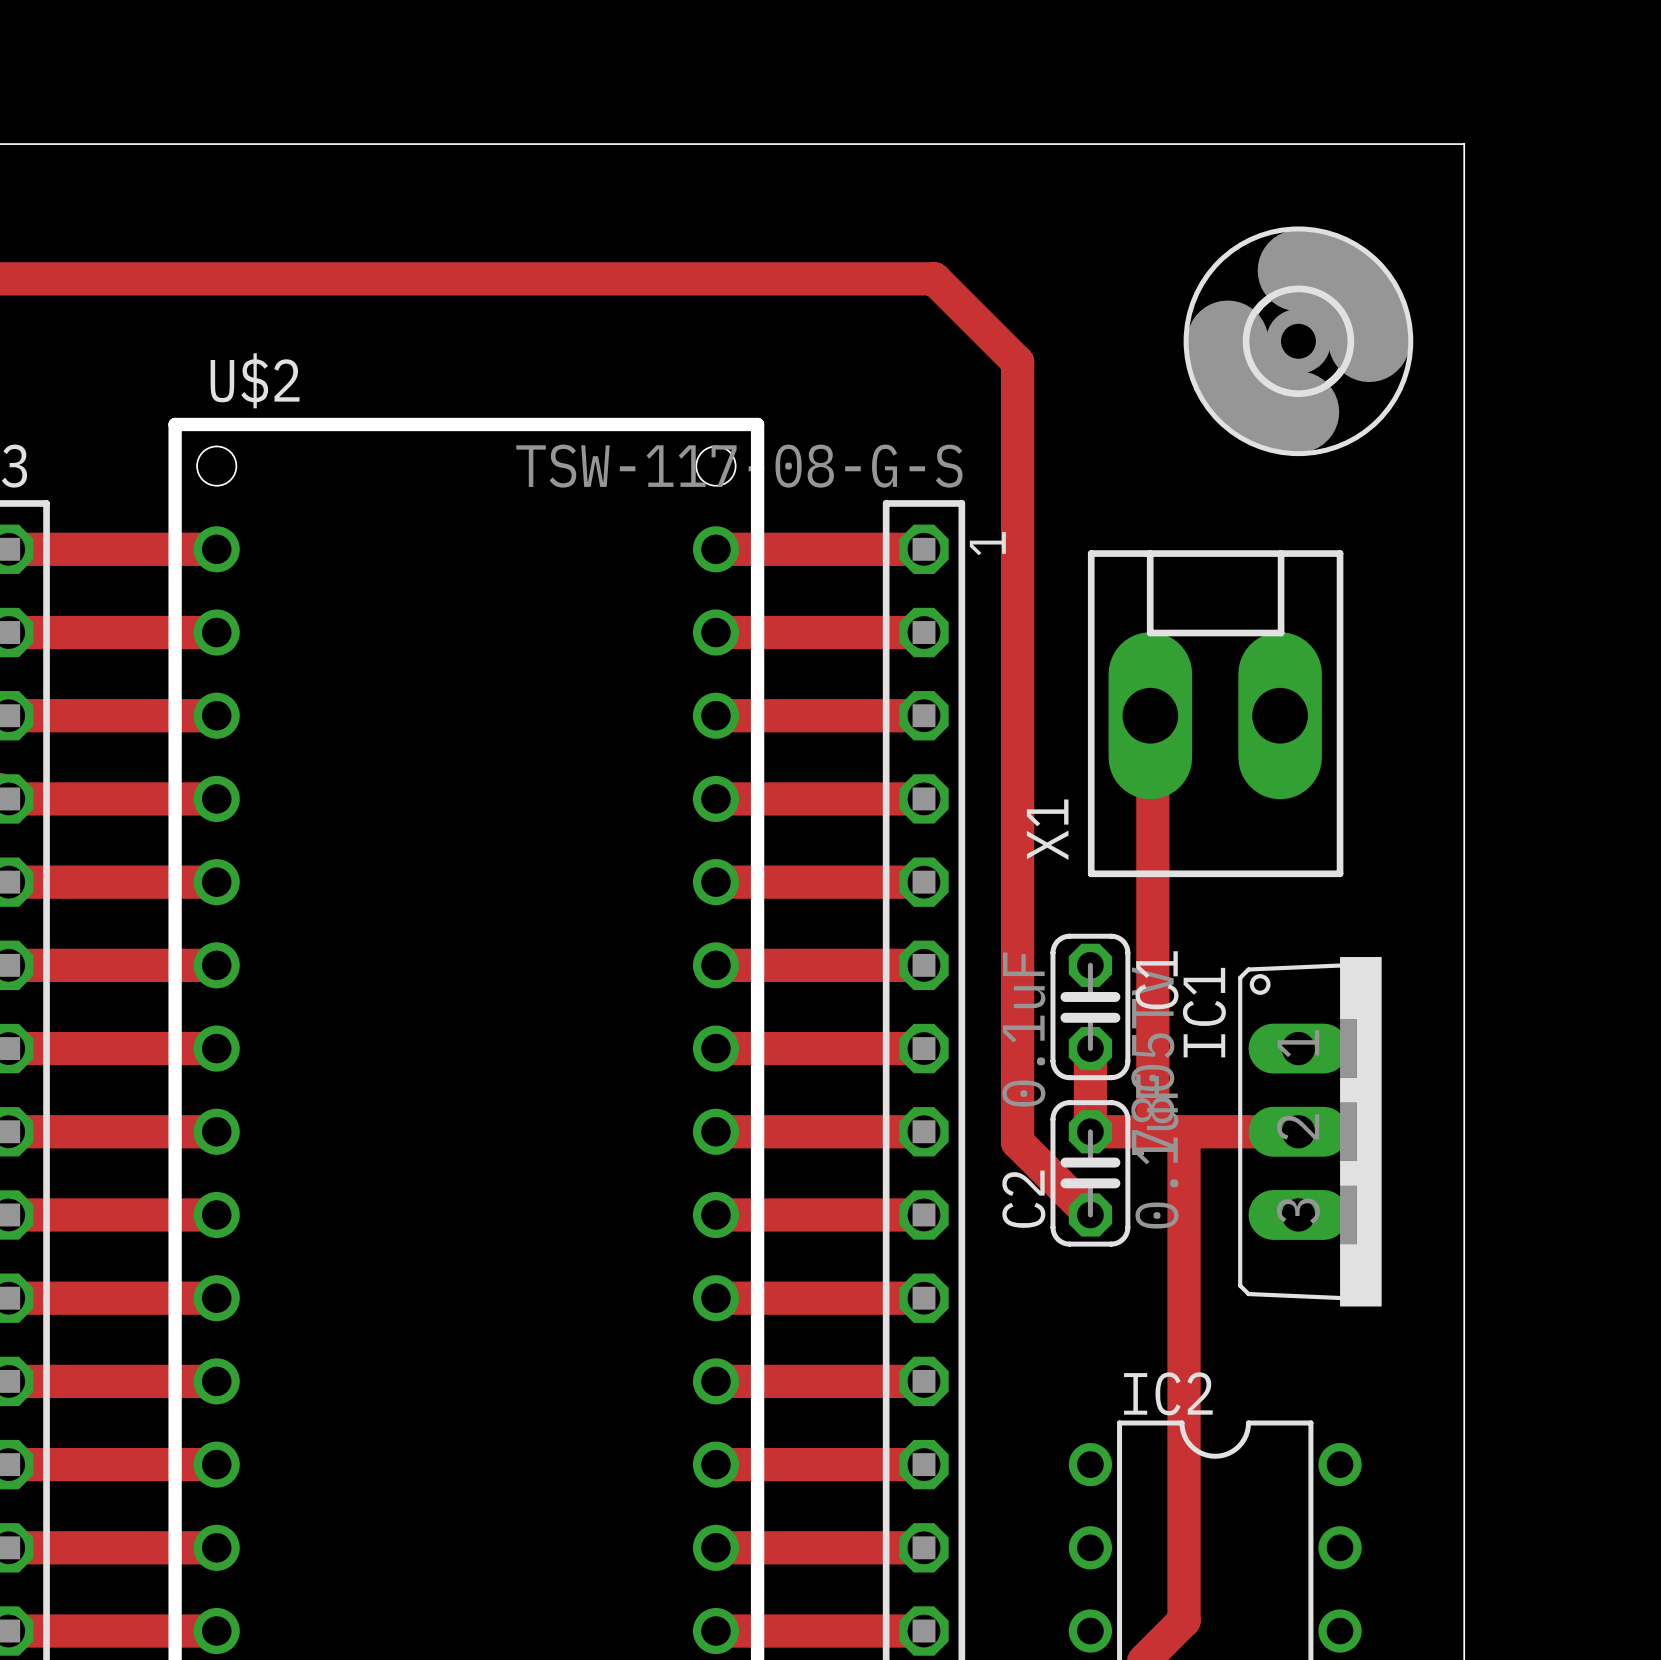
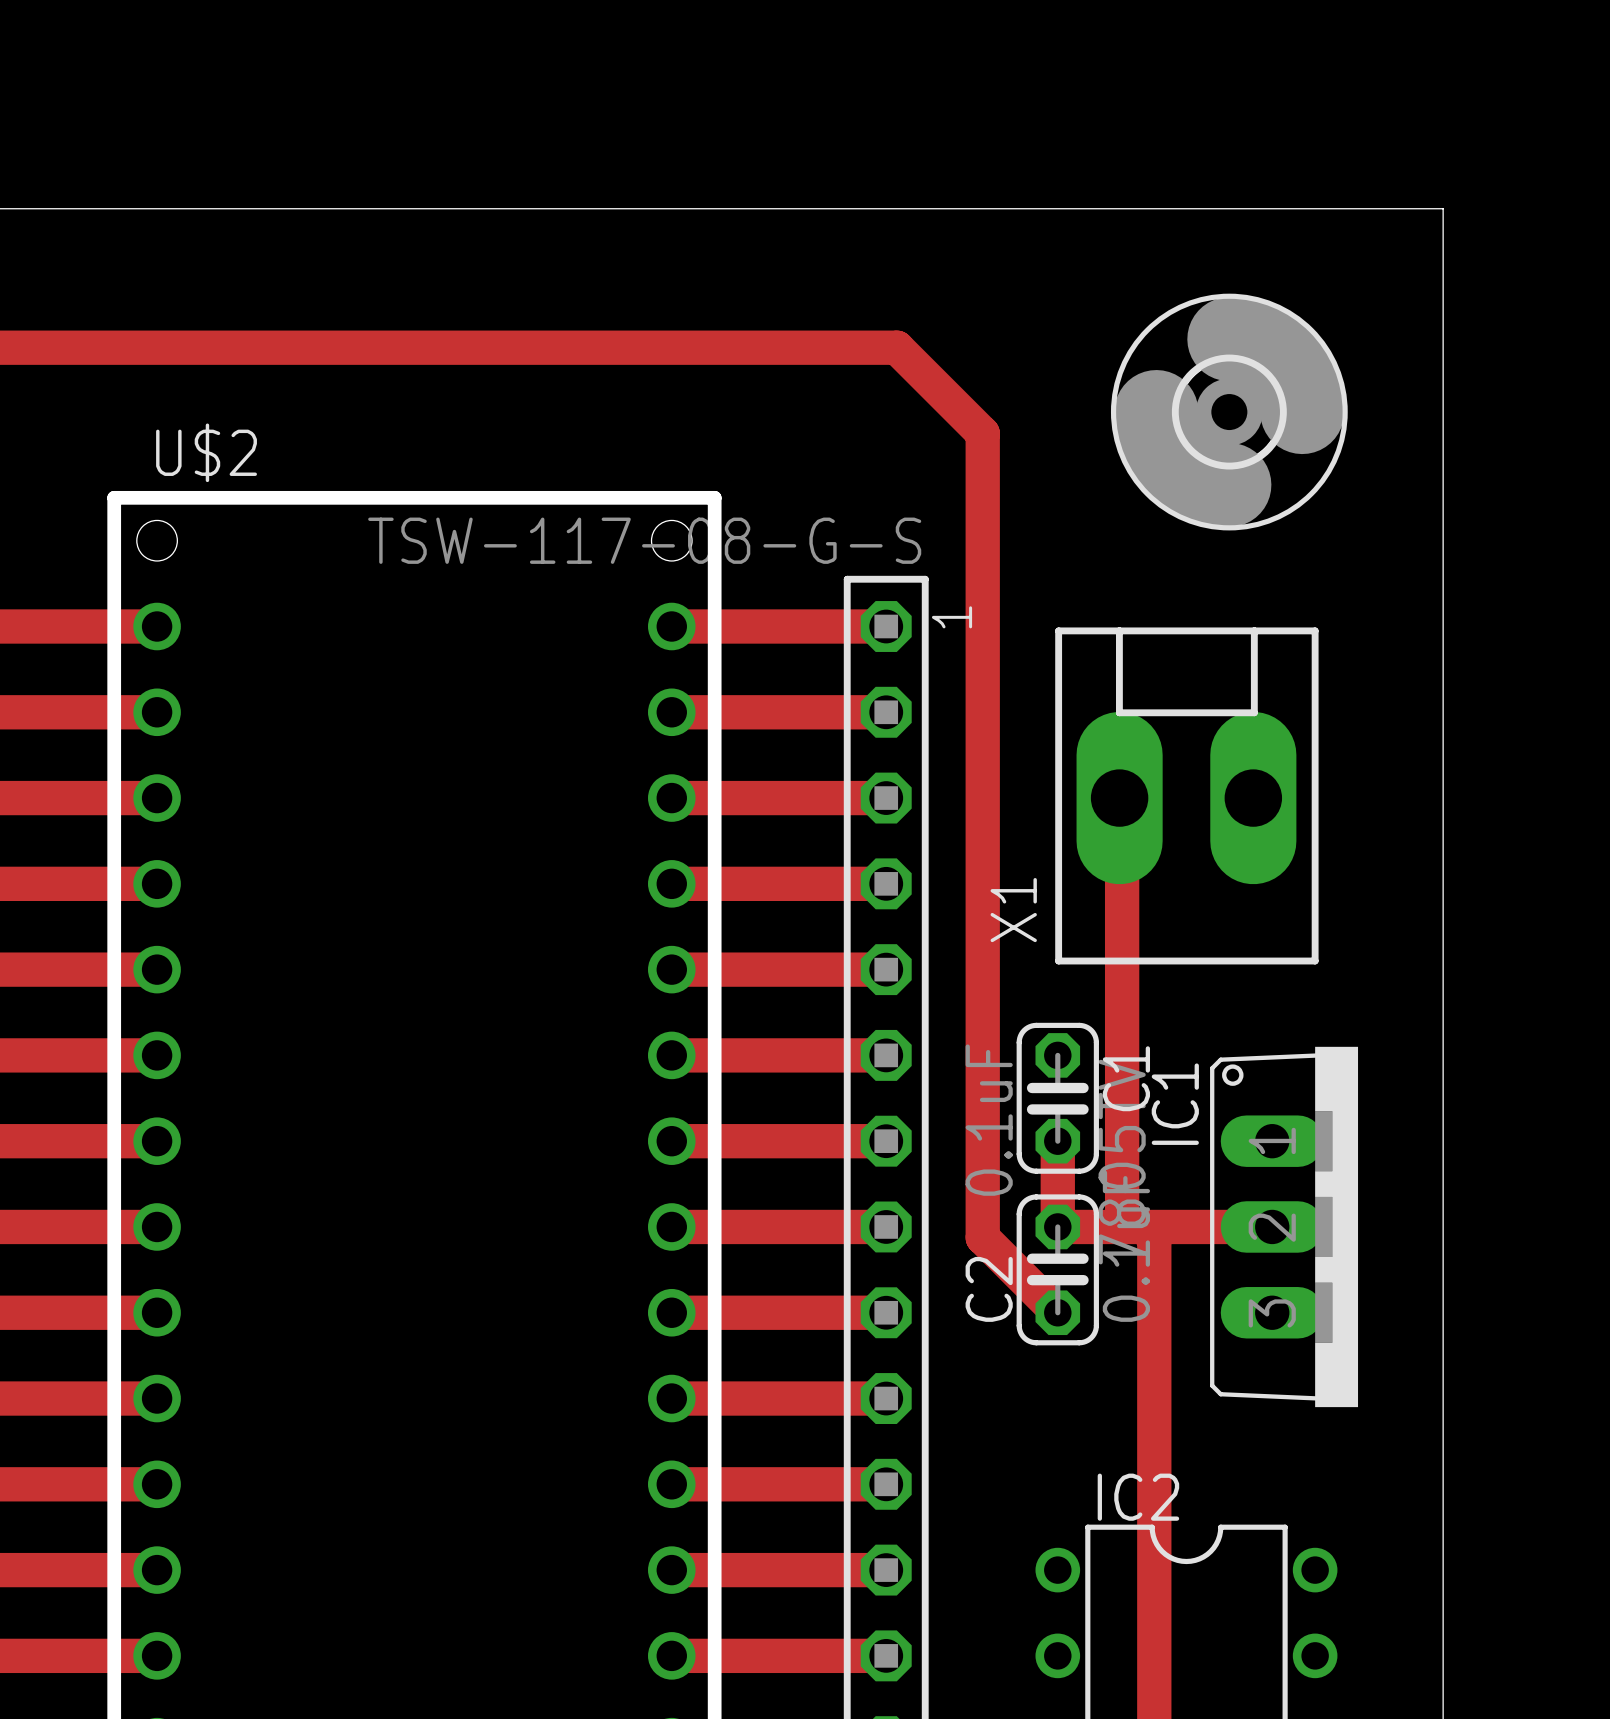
part position: (1298, 341) -> (1229, 412)

